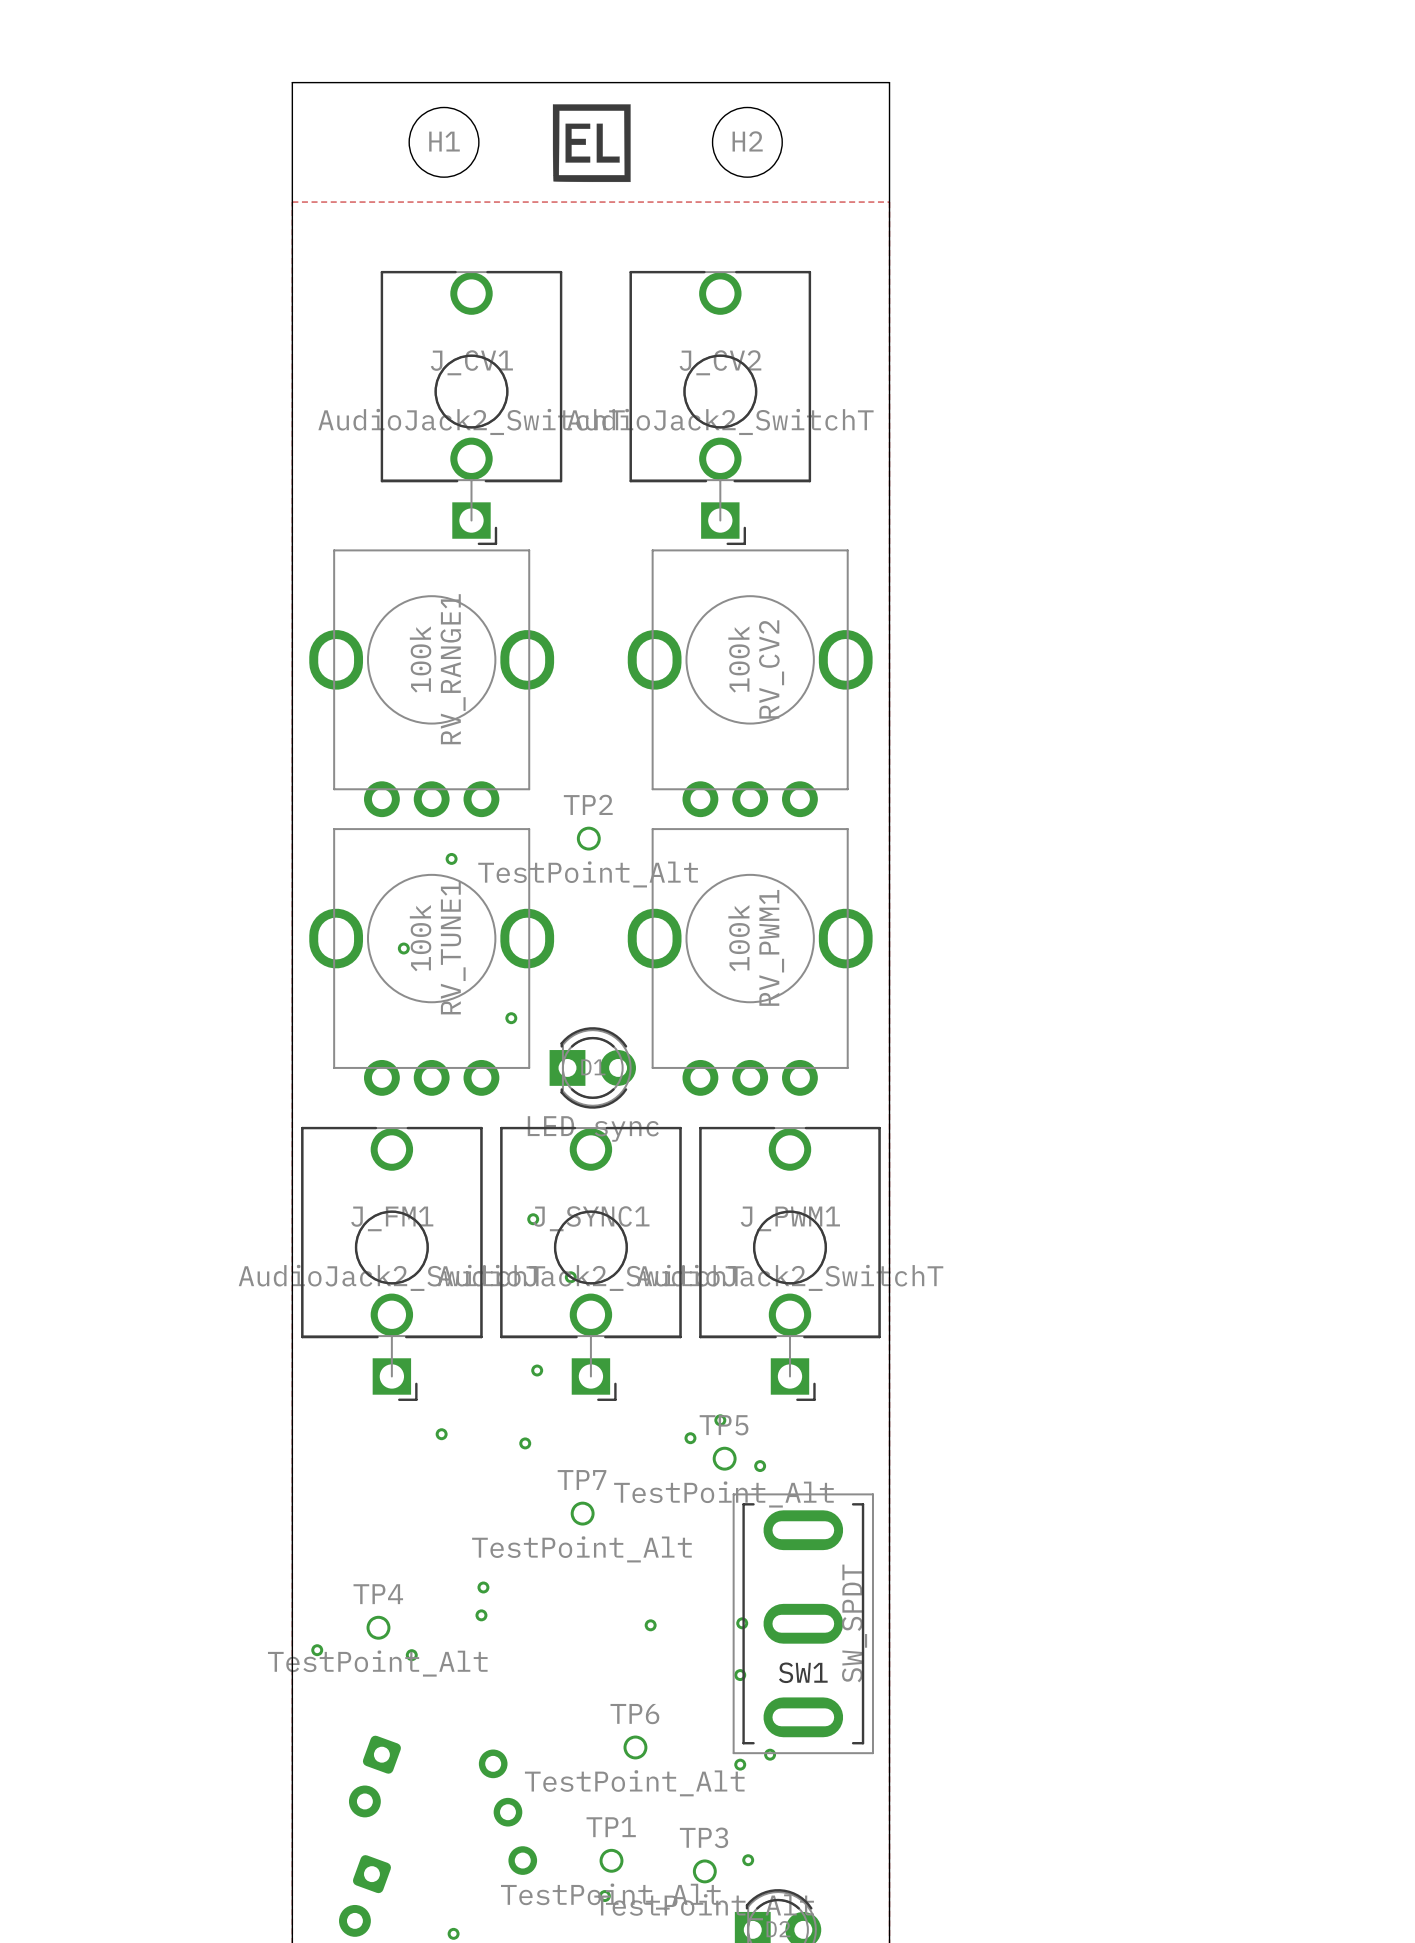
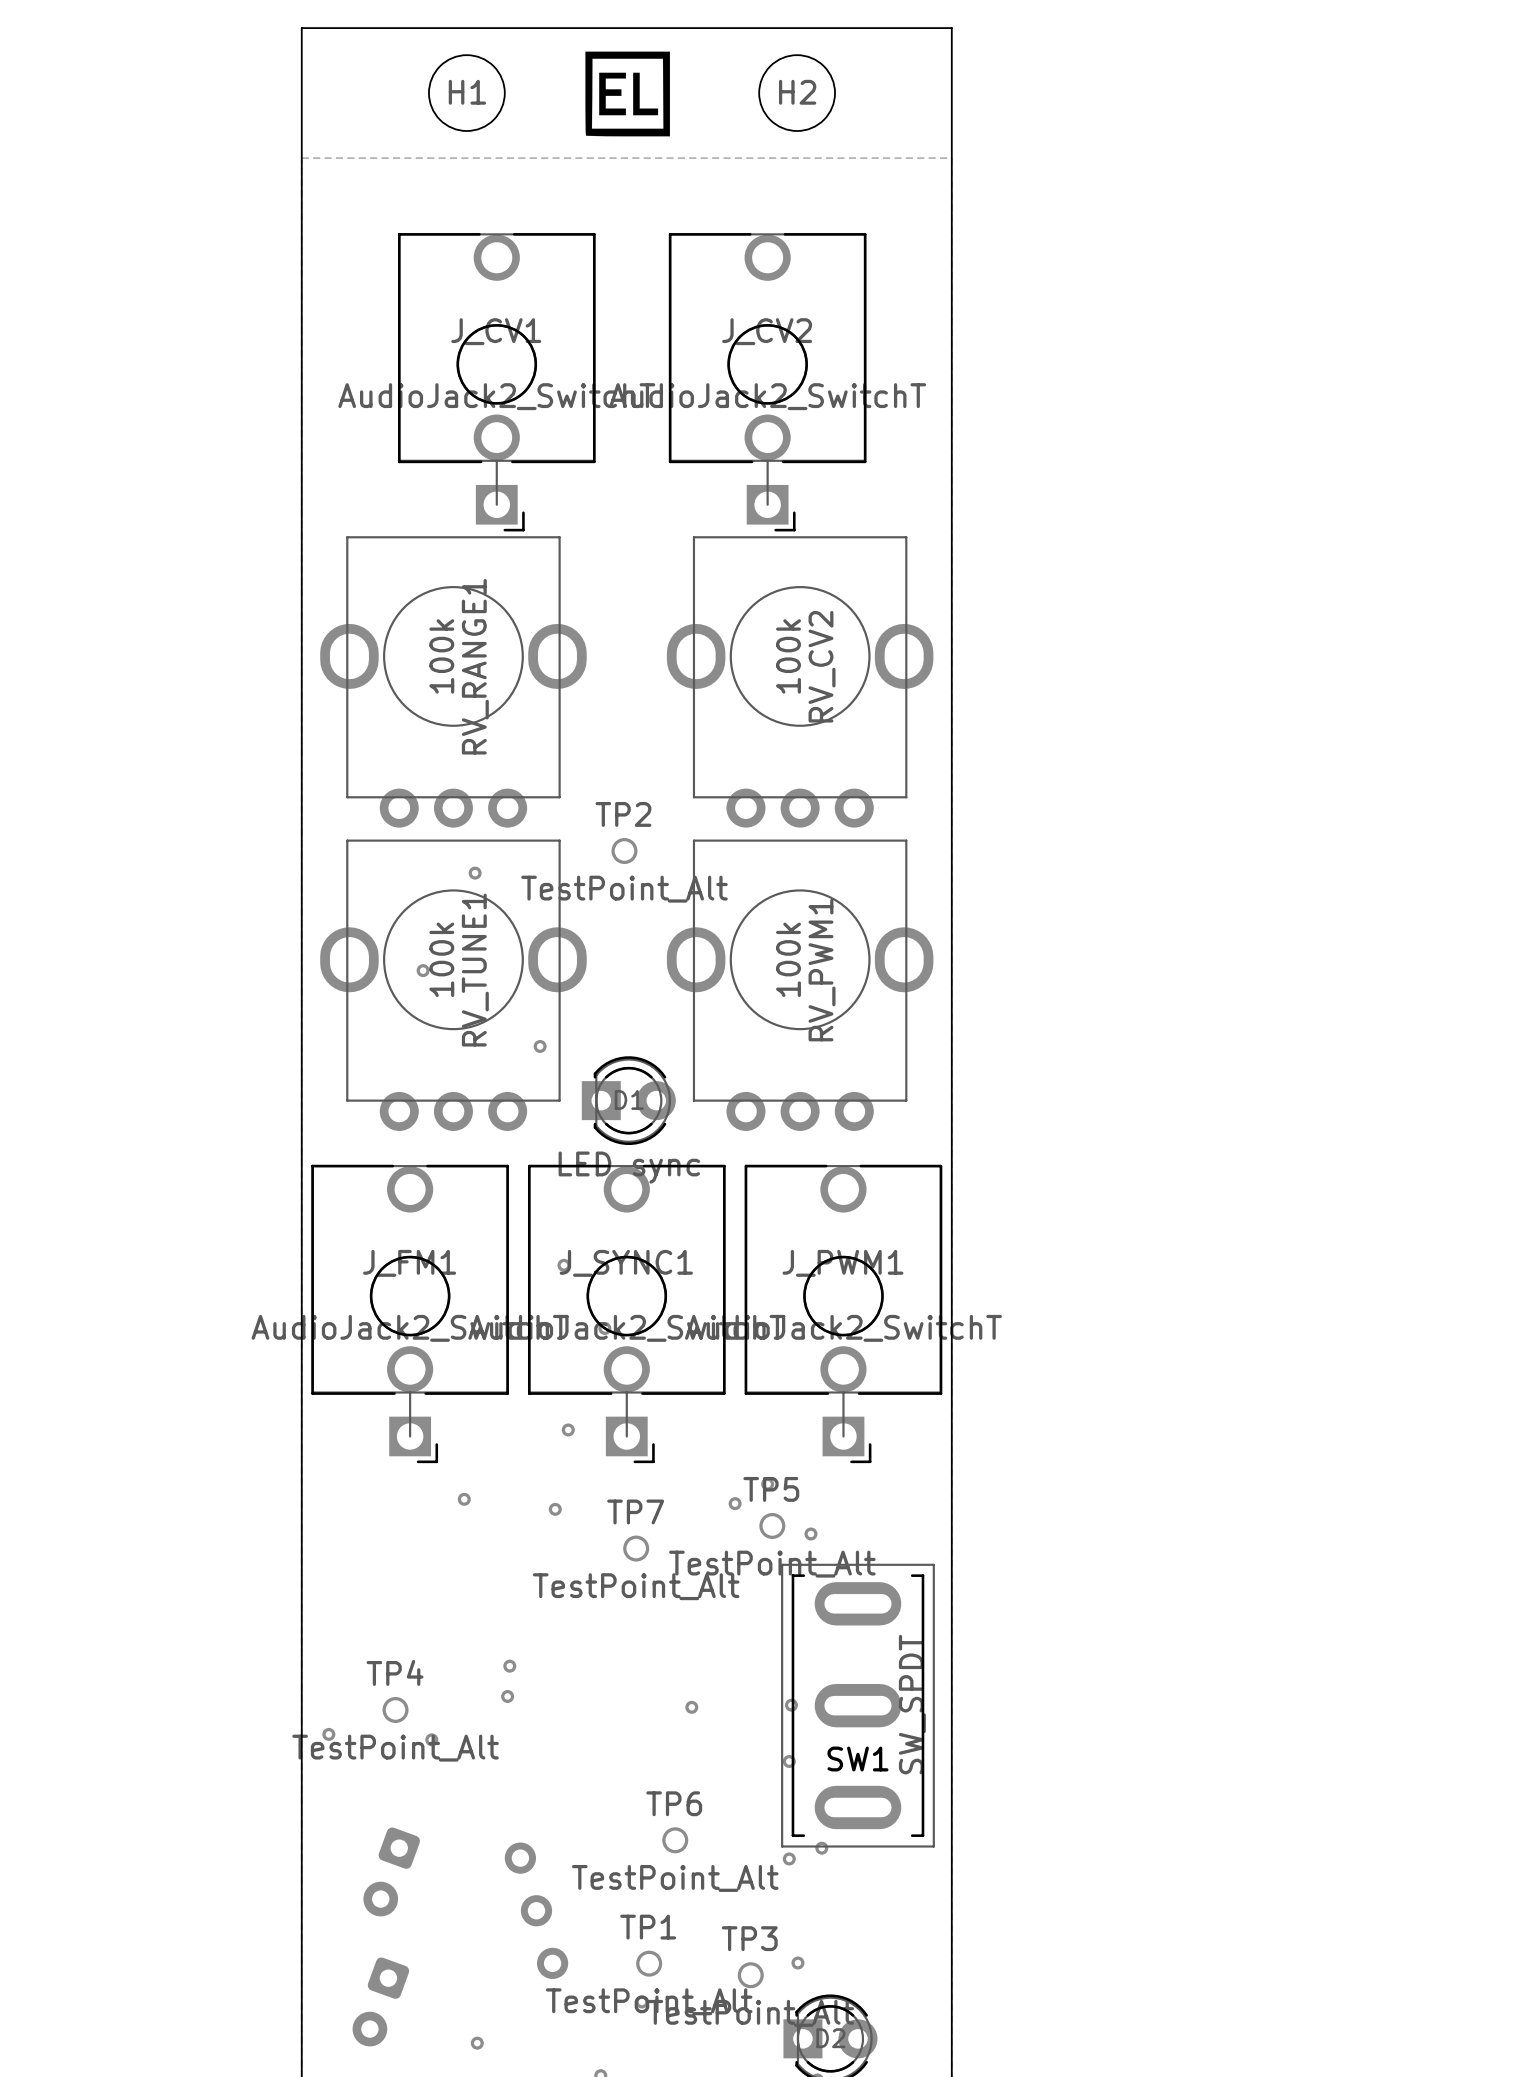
TP7 position: (582, 1513) -> (636, 1548)

